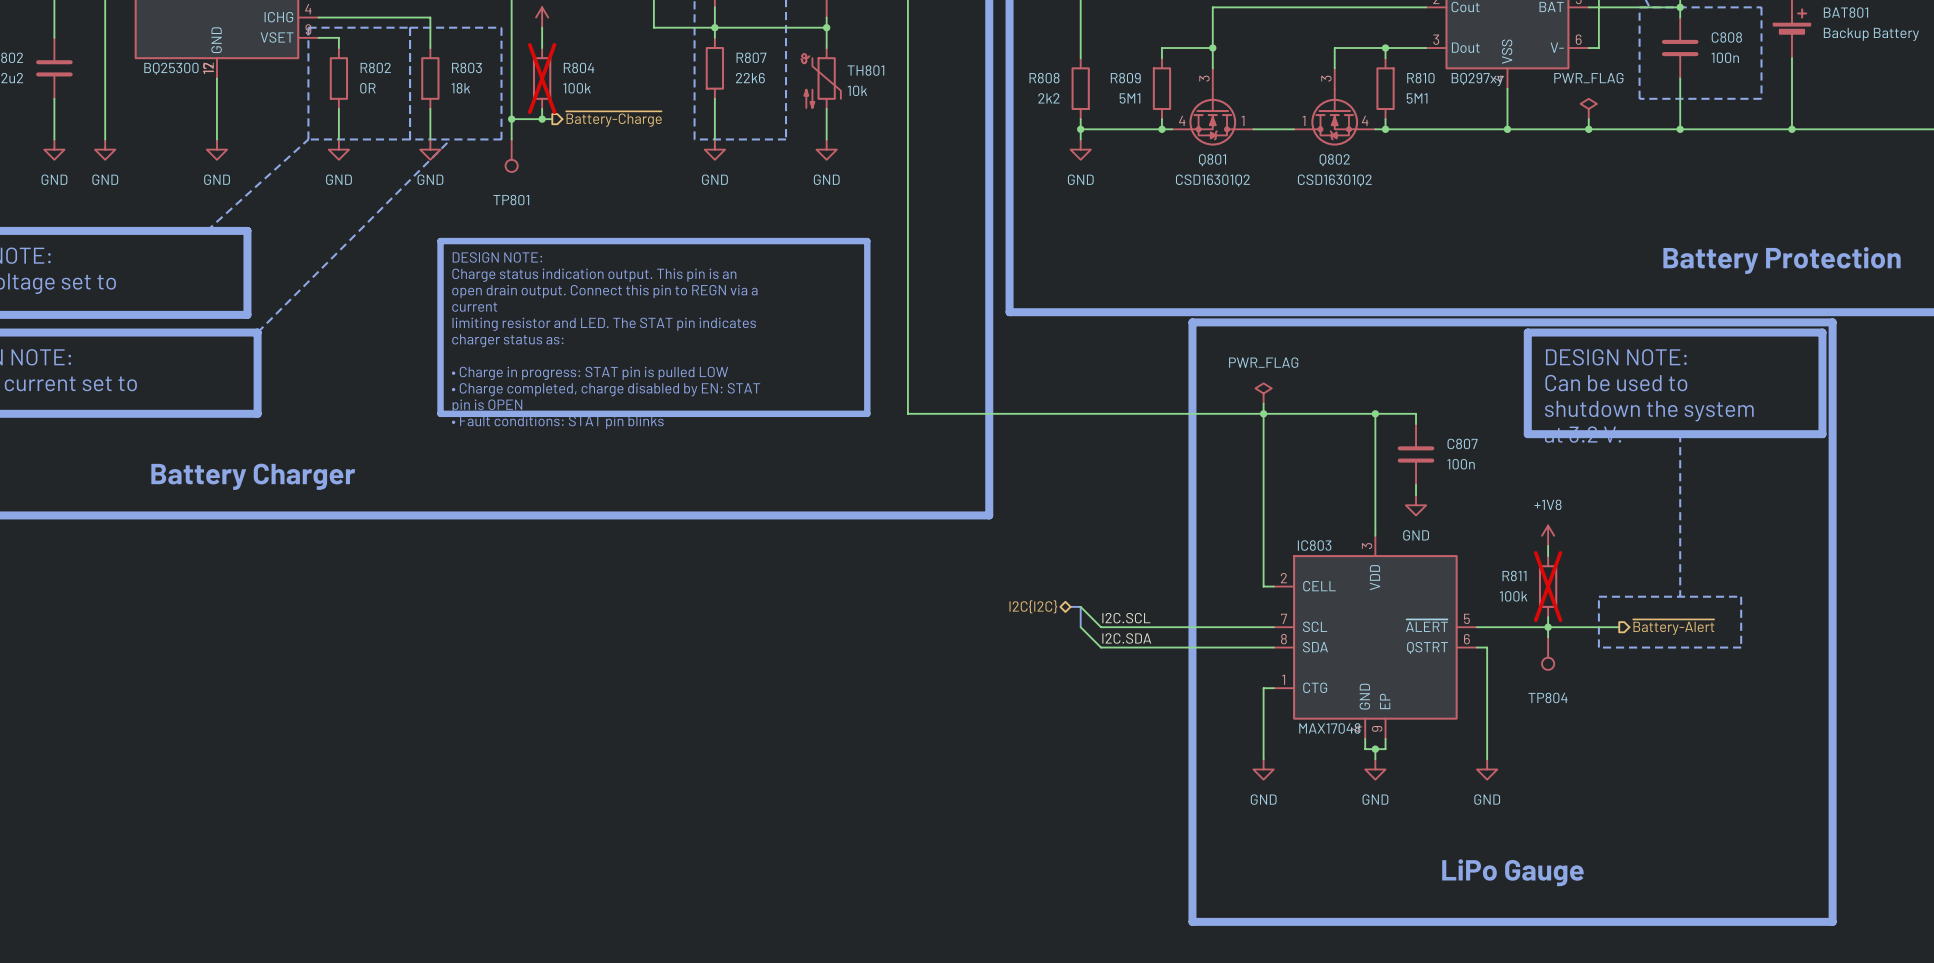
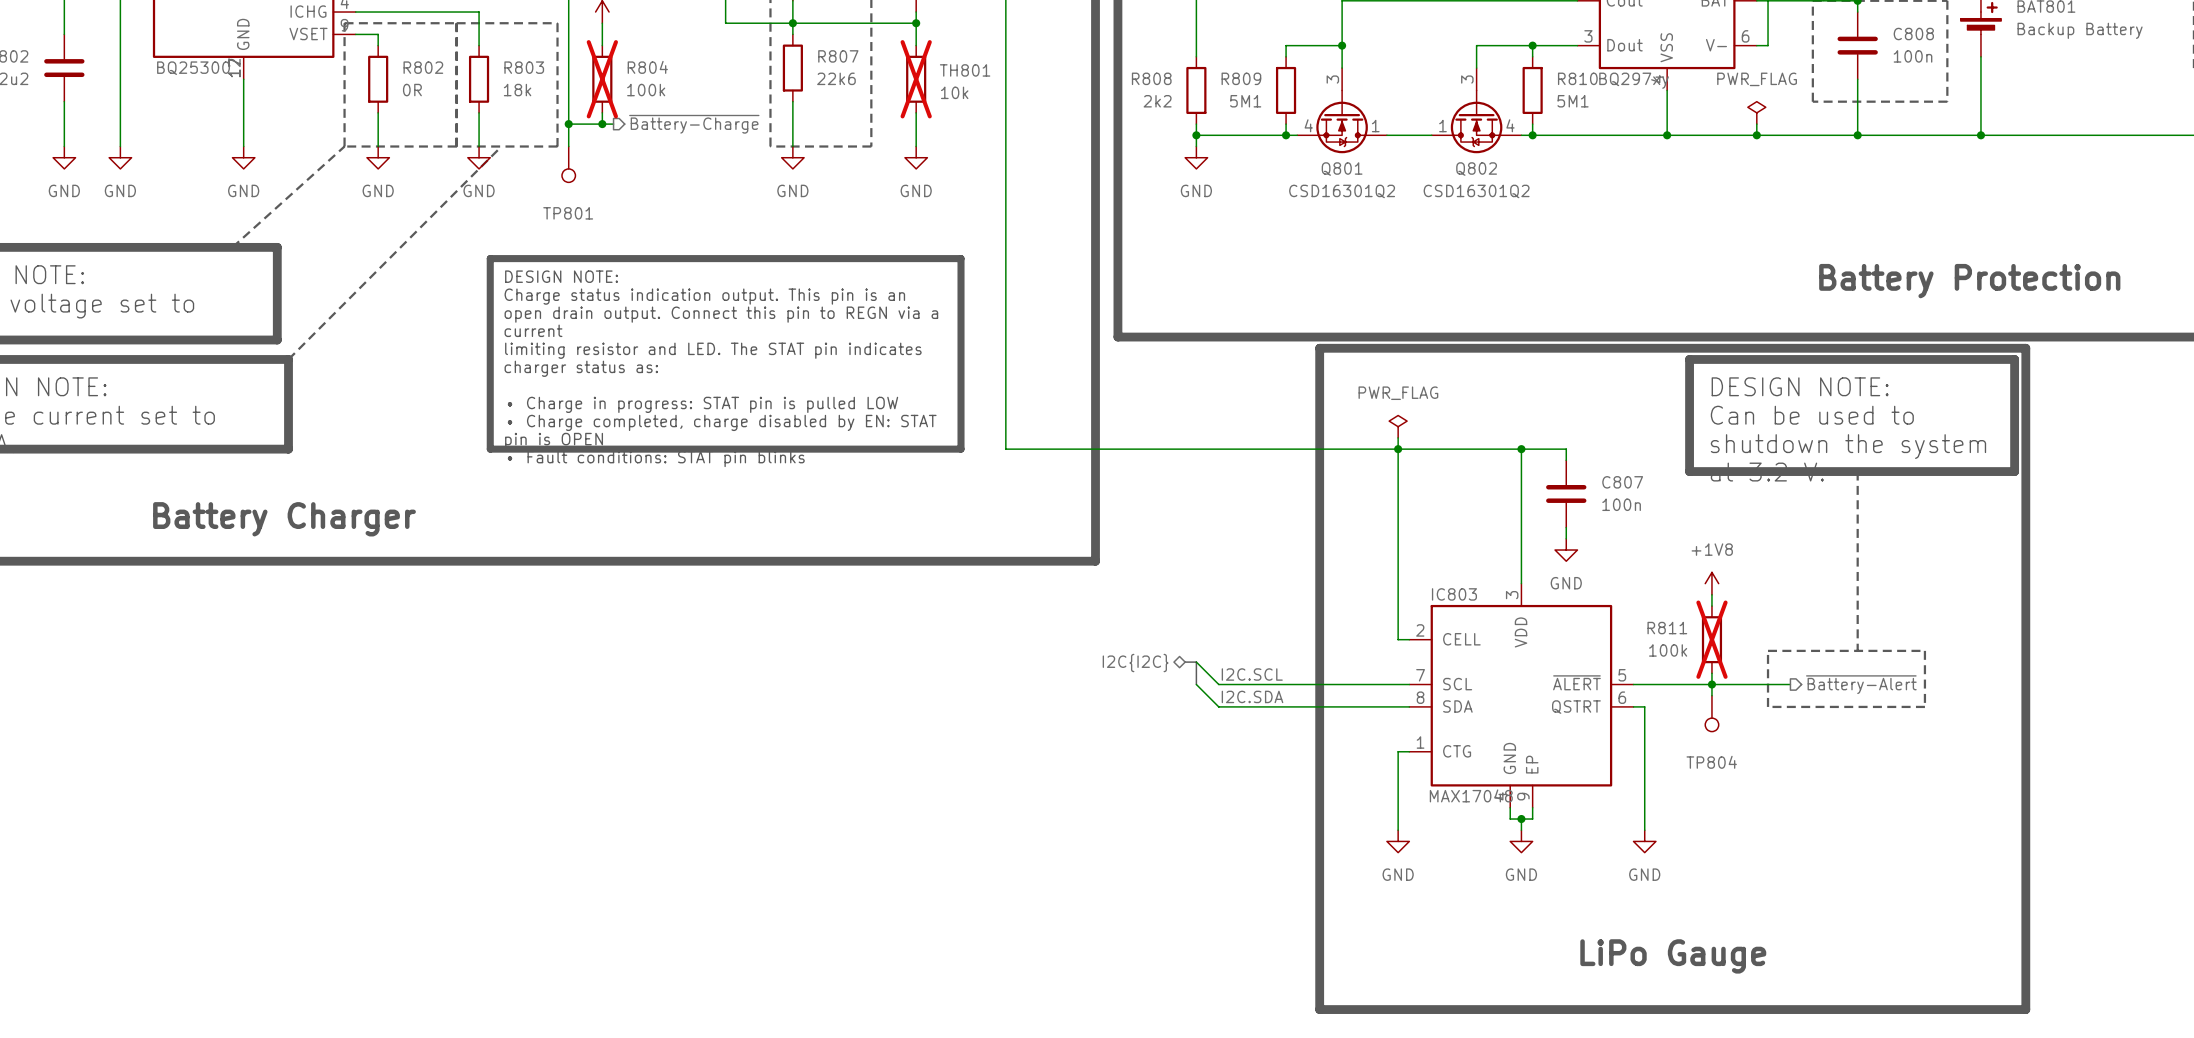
TH801 symbol: [801, 48, 841, 109] -> [906, 45, 927, 113]
TH801 do-not-place cross: none -> (916, 79)

